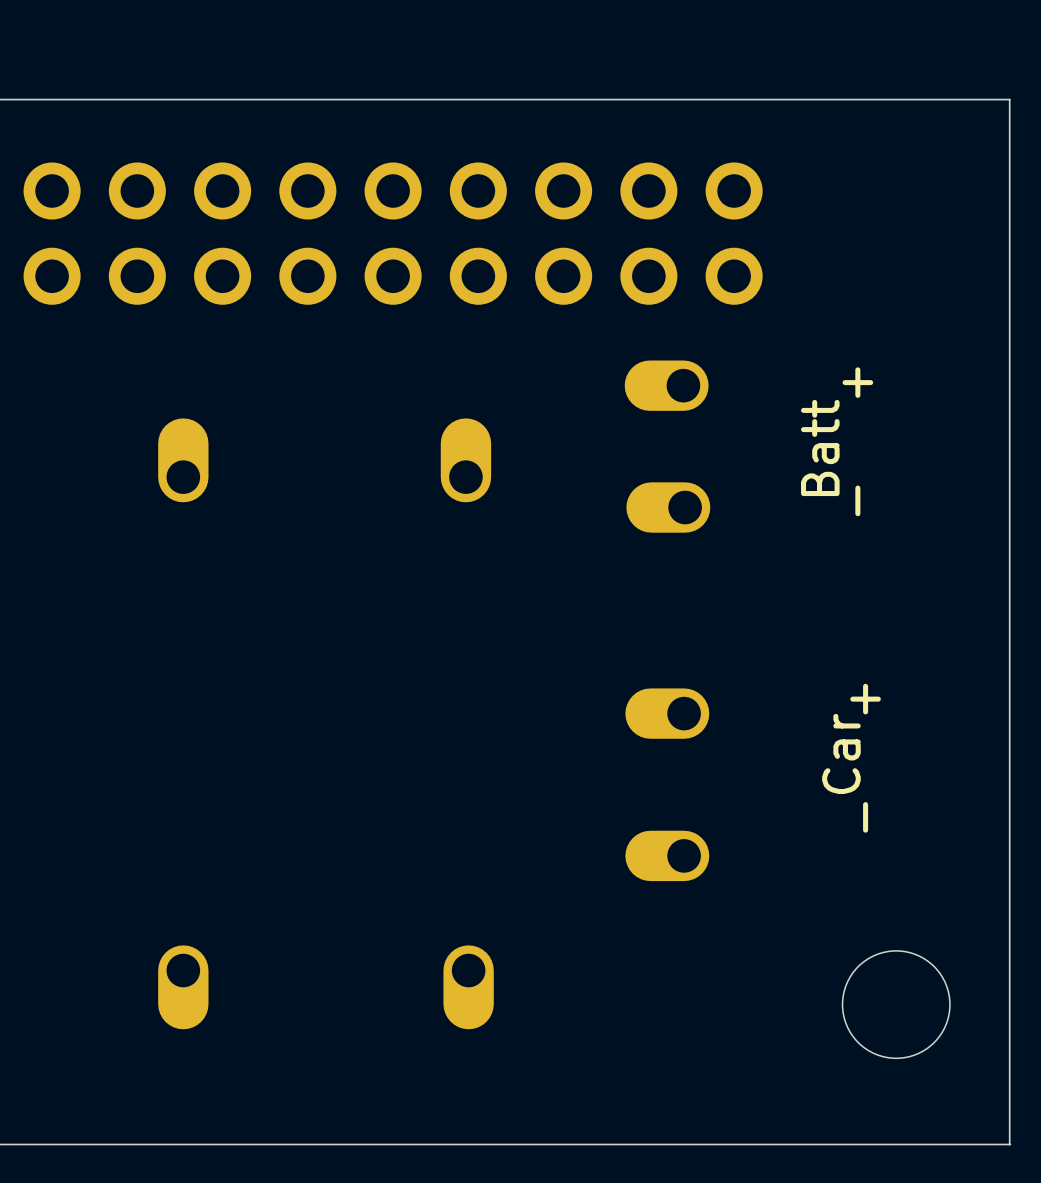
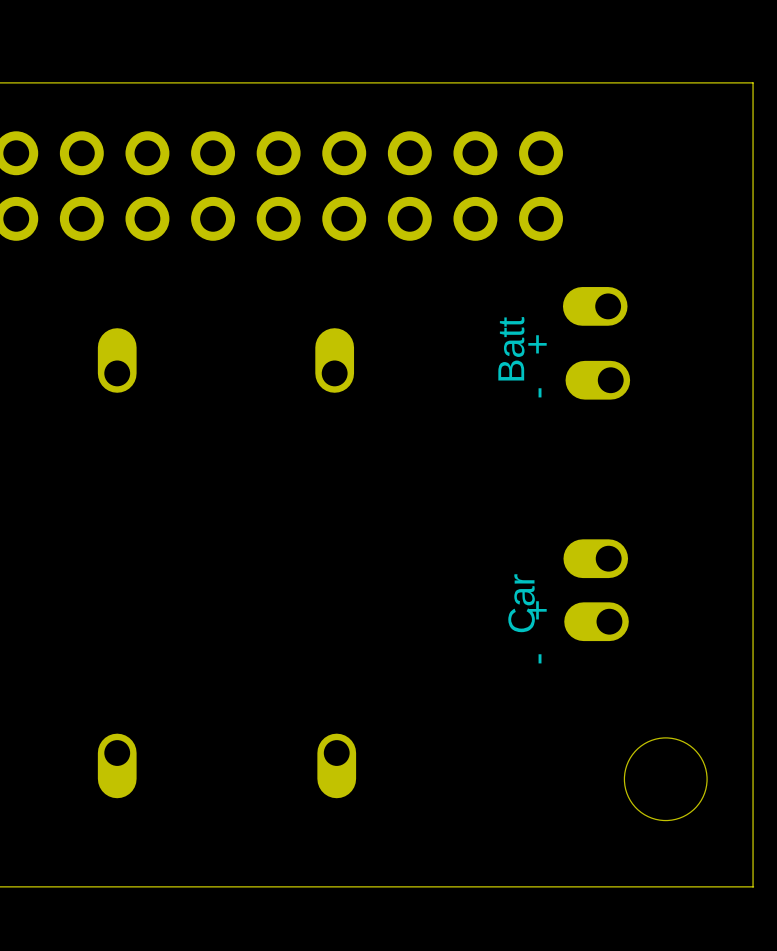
part: (666, 385) -> none
part: none -> (595, 306)
text position: - + (857, 441) -> - + (537, 366)
text position: Batt (820, 447) -> Batt (511, 348)
part: none -> (597, 380)
part: (668, 507) -> none
part: (667, 713) -> none
part: none -> (595, 558)
text position: Car (841, 753) -> Car (521, 603)
text position: - + (865, 758) -> - + (537, 632)
part: none -> (596, 621)
part: (667, 855) -> none

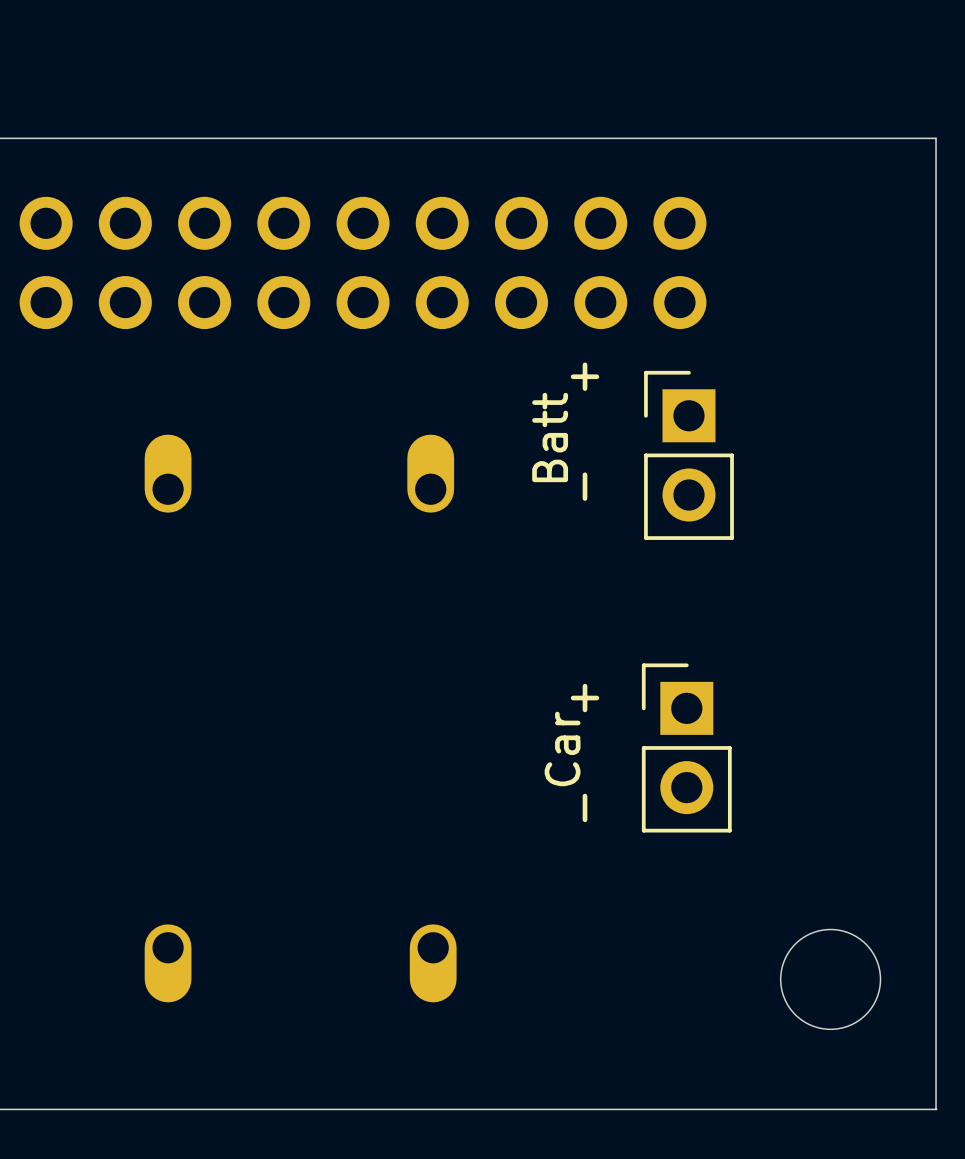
part: (595, 306) -> none
part: none -> (688, 455)
text position: Batt (511, 348) -> Batt (550, 437)
text position: - + (537, 366) -> - + (585, 431)
part: (597, 380) -> none
part: (595, 558) -> none
part: none -> (686, 747)
text position: Car (521, 603) -> Car (562, 748)
part: (596, 621) -> none
text position: - + (537, 632) -> - + (585, 752)

